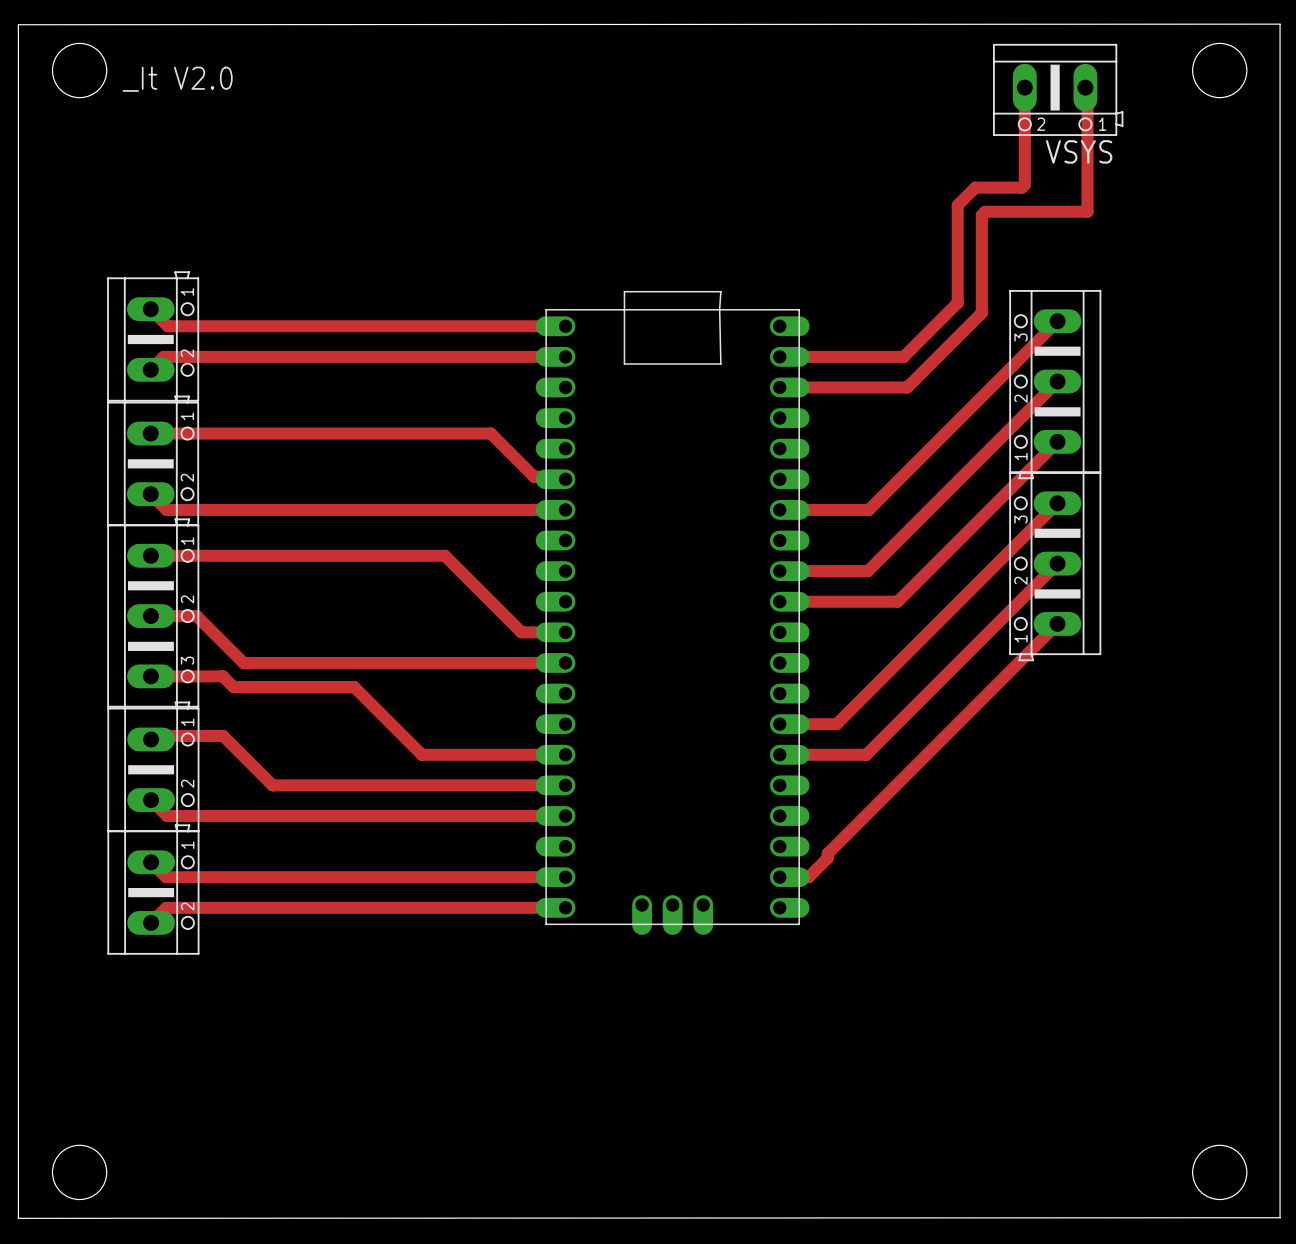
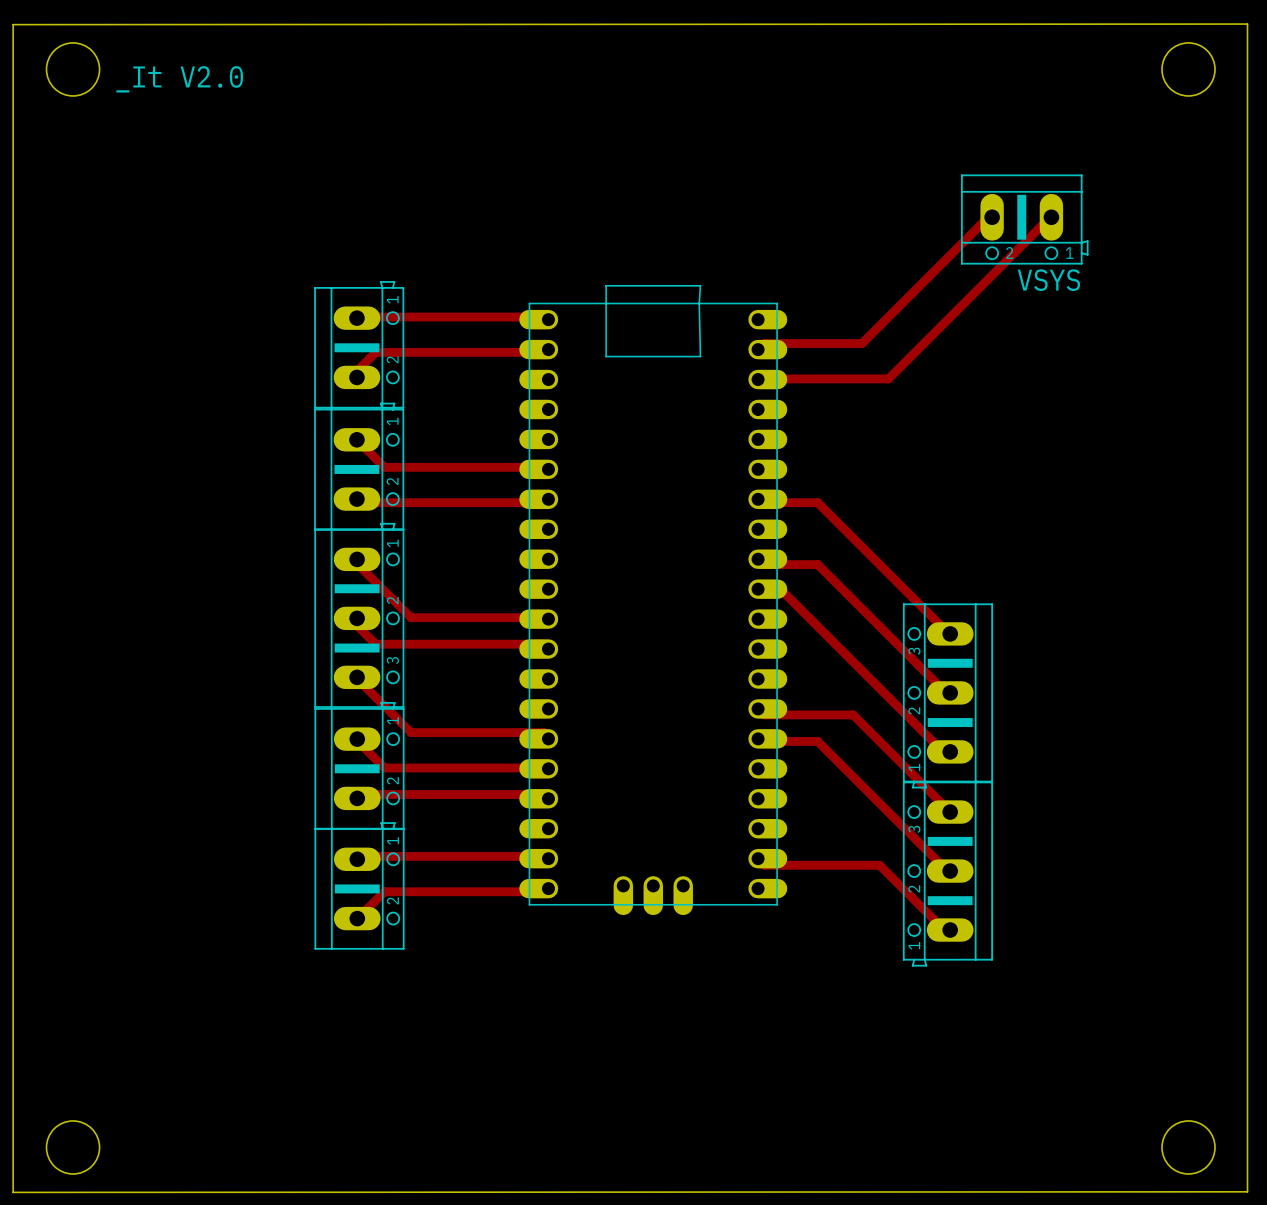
top track: (1024, 87) (1024, 184) (1021, 187) (975, 187) (957, 205) (957, 302) (903, 356) (779, 356) -> (992, 217) (985, 219) (862, 343) (764, 343) (758, 349)
top track: (1085, 87) (1087, 89) (1087, 211) (985, 211) (981, 215) (981, 312) (907, 387) (779, 387) -> (1051, 217) (888, 378) (758, 379)
VSYS position: (1058, 89) -> (1024, 219)
top track: (150, 309) (167, 326) (565, 326) -> (356, 318) (543, 317) (548, 319)
top track: (1057, 321) (868, 509) (779, 509) -> (950, 633) (817, 502) (764, 502) (758, 499)
part: (153, 336) -> none
part: none -> (359, 344)
top track: (565, 356) (163, 356) (150, 369) -> (548, 349) (543, 352) (375, 352) (357, 370) (356, 377)
top track: (1057, 381) (867, 571) (779, 571) -> (950, 692) (941, 688) (817, 564) (764, 564) (758, 559)
part: (1055, 384) -> none
top track: (150, 433) (490, 433) (534, 476) (562, 476) (565, 479) -> (356, 439) (384, 467) (543, 467) (548, 469)
top track: (1057, 441) (897, 601) (779, 601) -> (950, 751) (941, 750) (782, 591) (758, 589)
part: (153, 460) -> none
part: none -> (359, 466)
top track: (150, 494) (166, 509) (565, 509) -> (356, 499) (357, 502) (543, 502) (548, 499)
top track: (1057, 503) (836, 724) (779, 724) -> (950, 812) (853, 714) (764, 714) (758, 708)
top track: (150, 555) (444, 555) (521, 632) (565, 632) -> (357, 564) (411, 617) (548, 619)
top track: (1057, 563) (866, 754) (779, 754) -> (950, 871) (941, 865) (817, 741) (764, 741) (758, 738)
part position: (1055, 566) -> (947, 695)
part position: (153, 613) -> (359, 615)
top track: (150, 616) (196, 616) (243, 662) (565, 662) -> (357, 618) (357, 626) (375, 644) (543, 644) (548, 649)
top track: (1057, 623) (827, 853) (827, 858) (808, 877) (779, 877) -> (950, 930) (941, 927) (879, 865) (764, 865) (758, 858)
top track: (150, 676) (222, 676) (233, 687) (354, 687) (421, 754) (565, 754) -> (357, 677) (411, 732) (543, 732) (548, 738)
top track: (145, 735) (223, 735) (272, 785) (565, 785) -> (357, 739) (384, 767) (548, 768)
part: (153, 766) -> none
part: none -> (359, 765)
top track: (151, 800) (167, 816) (565, 816) -> (357, 798) (357, 794) (543, 794) (548, 798)
top track: (151, 862) (166, 877) (565, 877) -> (357, 859) (357, 856) (543, 856) (548, 858)
part: (153, 889) -> none
part: none -> (947, 874)
part: none -> (359, 885)
top track: (565, 907) (166, 907) (151, 922) -> (548, 888) (543, 891) (384, 891) (357, 918)

